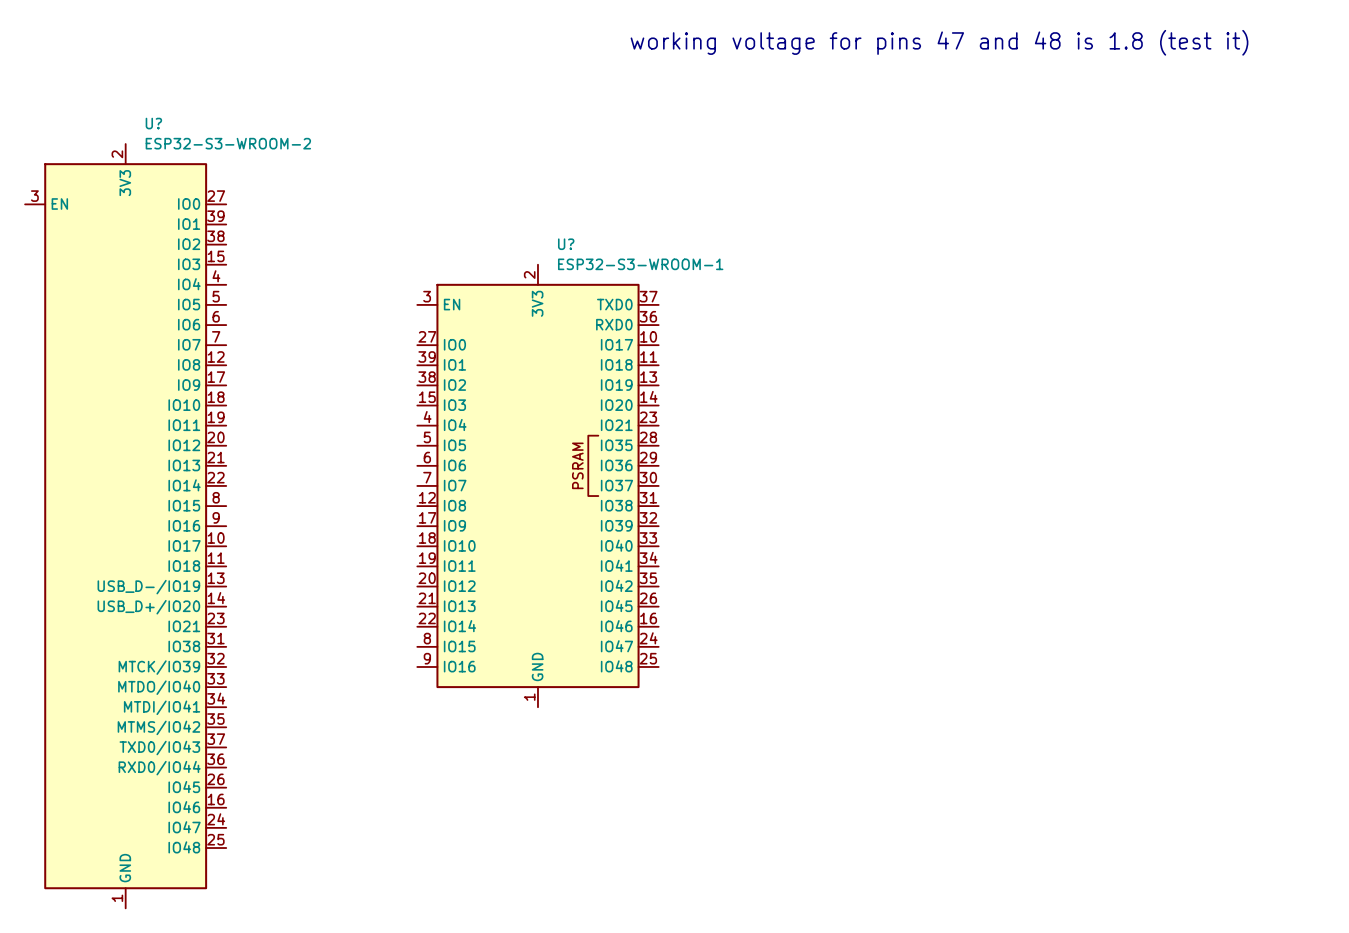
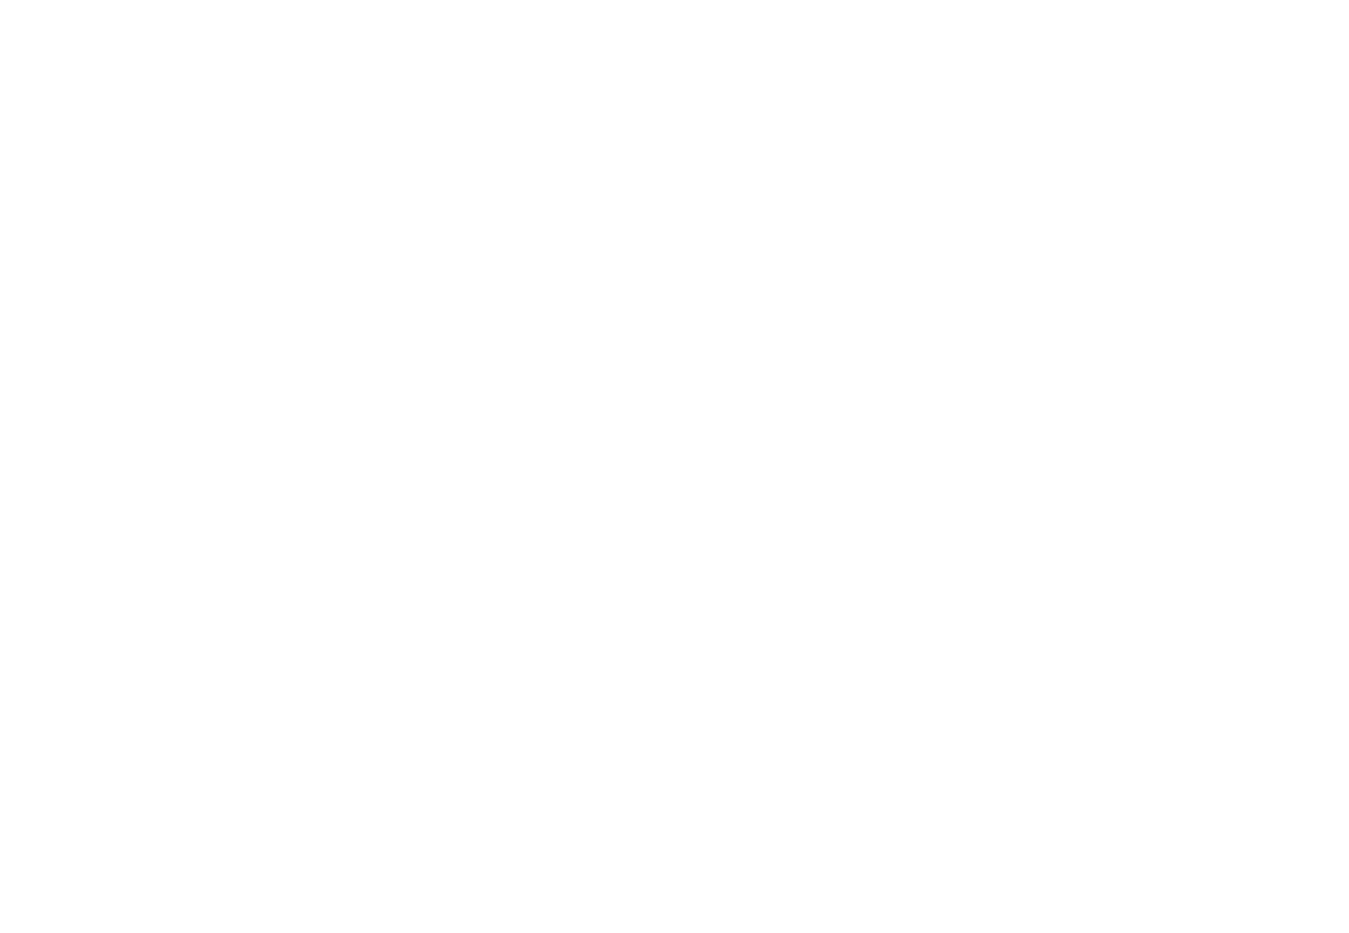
text: working voltage for pins 47 and 48 is 1.8 (test it) (939, 42) -> none
U?: ESP32-S3-WROOM-1 (537, 485) -> none
U?: ESP32-S3-WROOM-2 (125, 526) -> none

